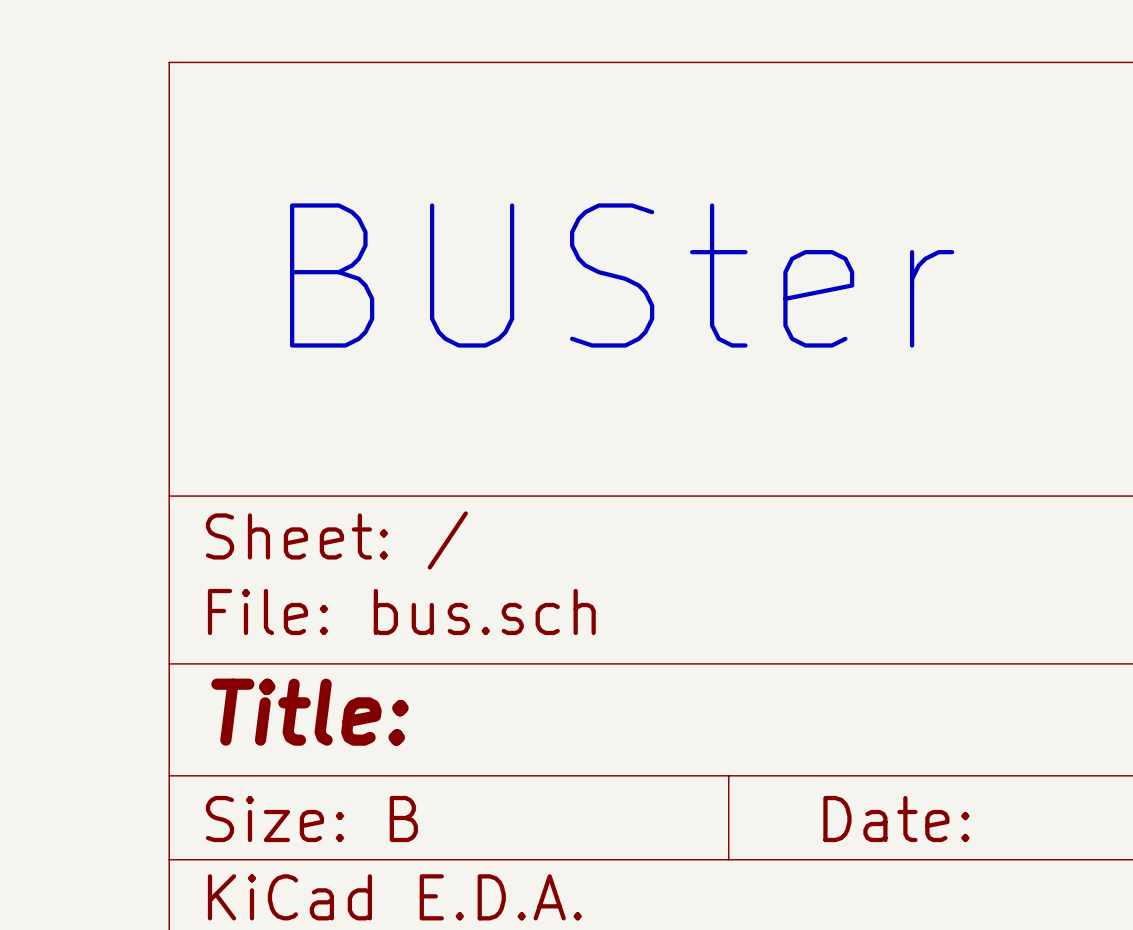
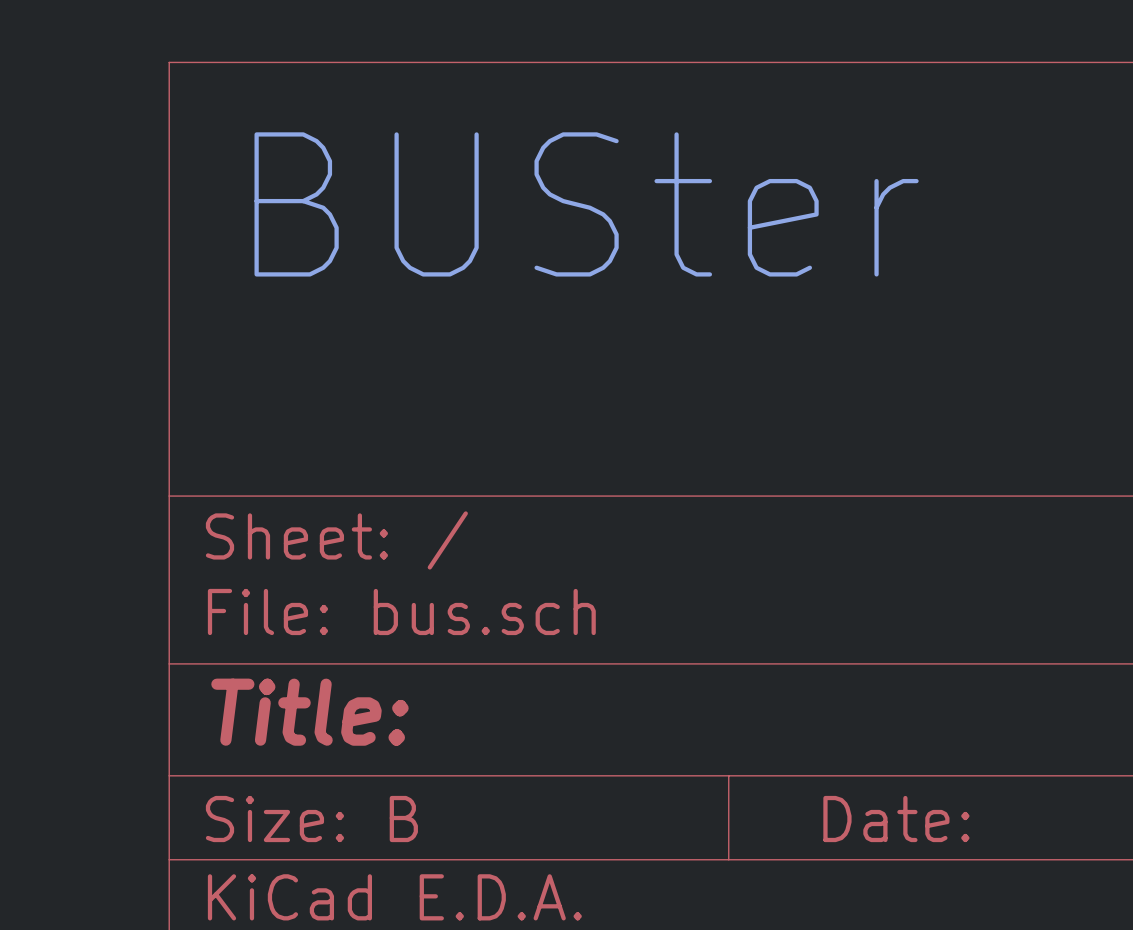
text position: BUSter (622, 275) -> BUSter (586, 204)

